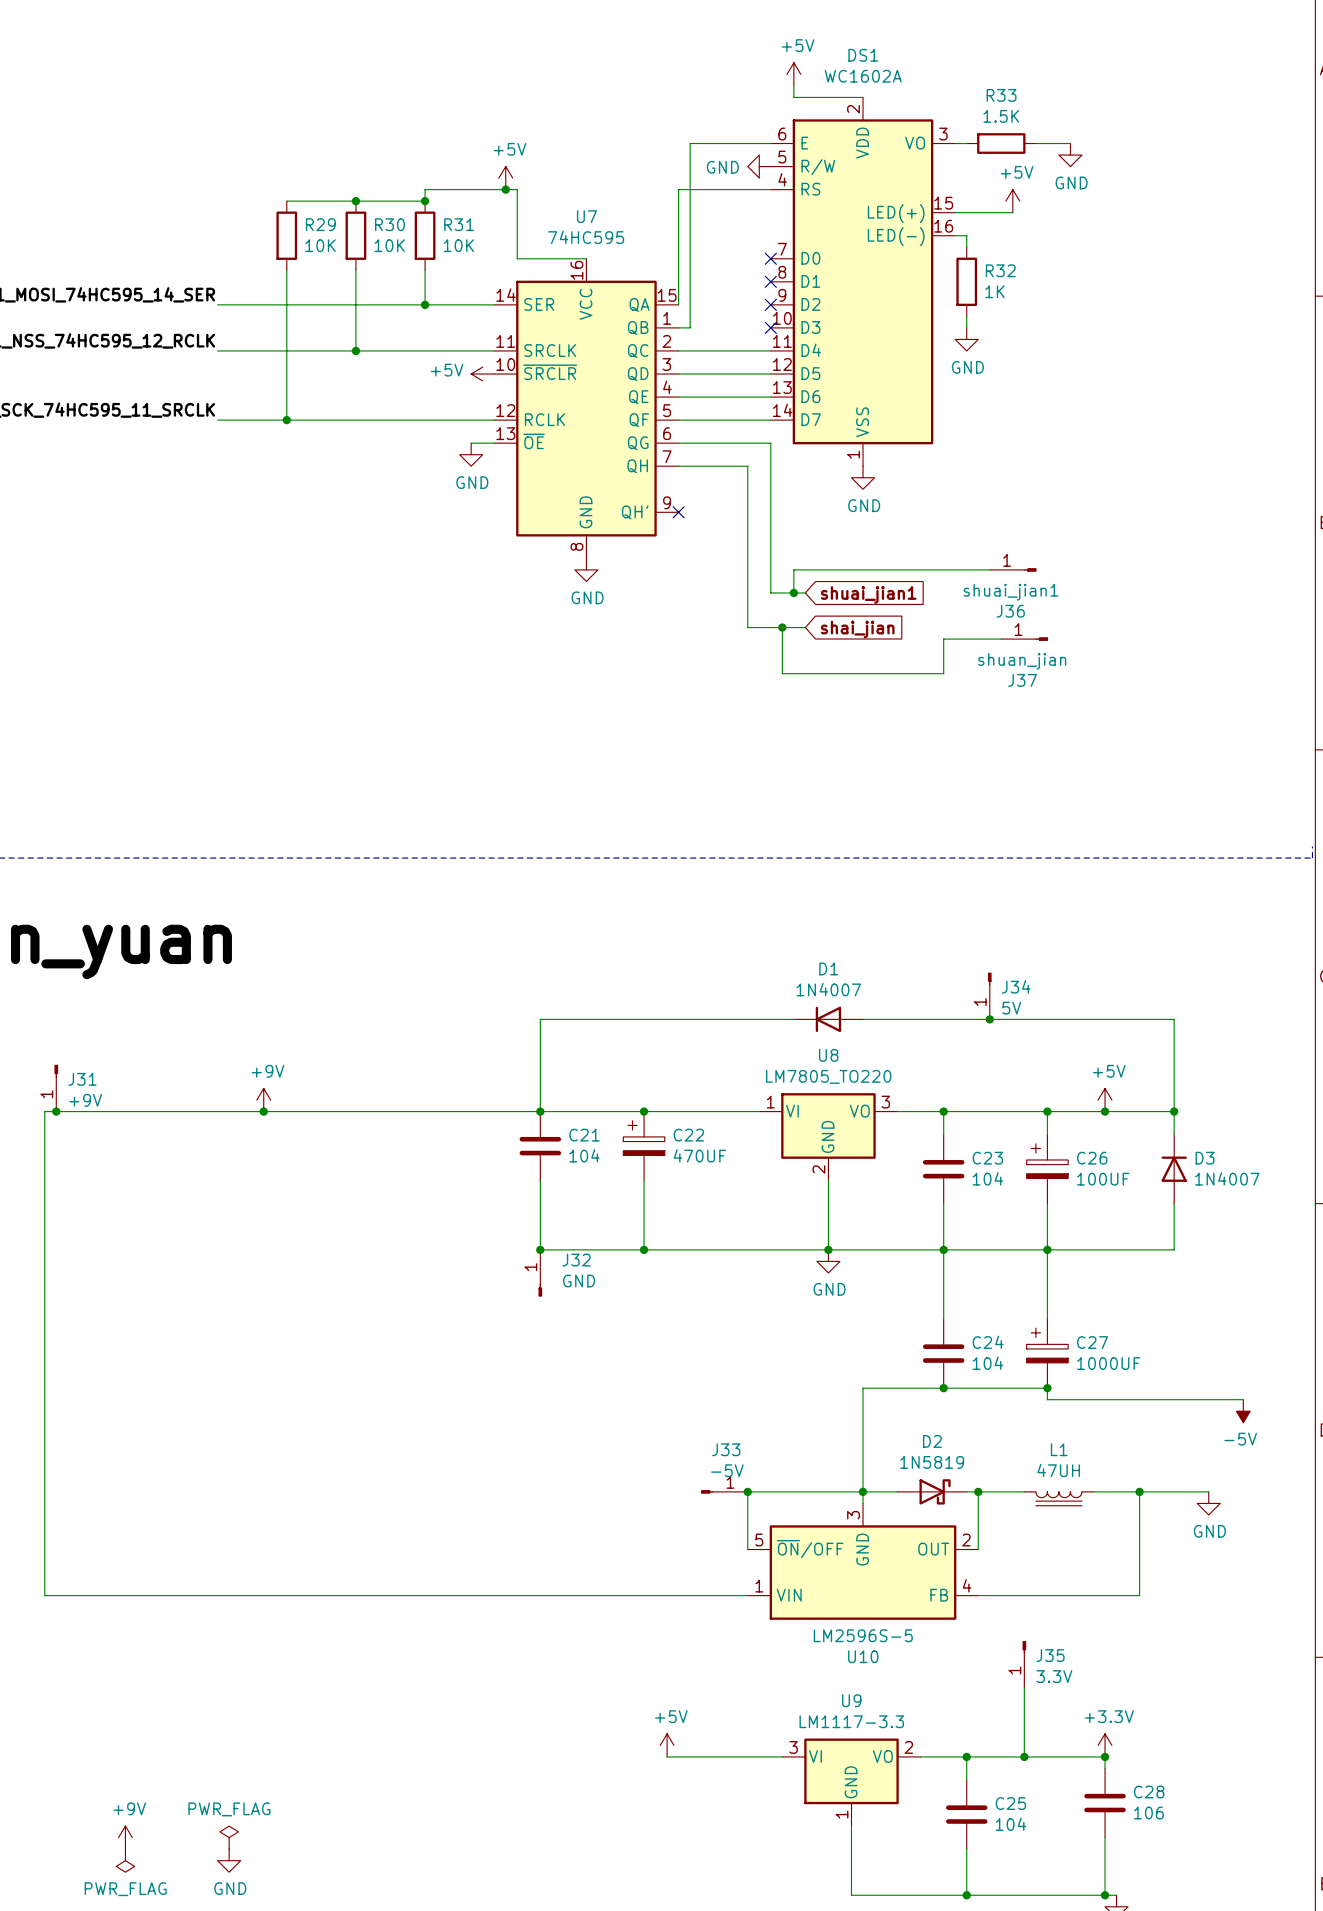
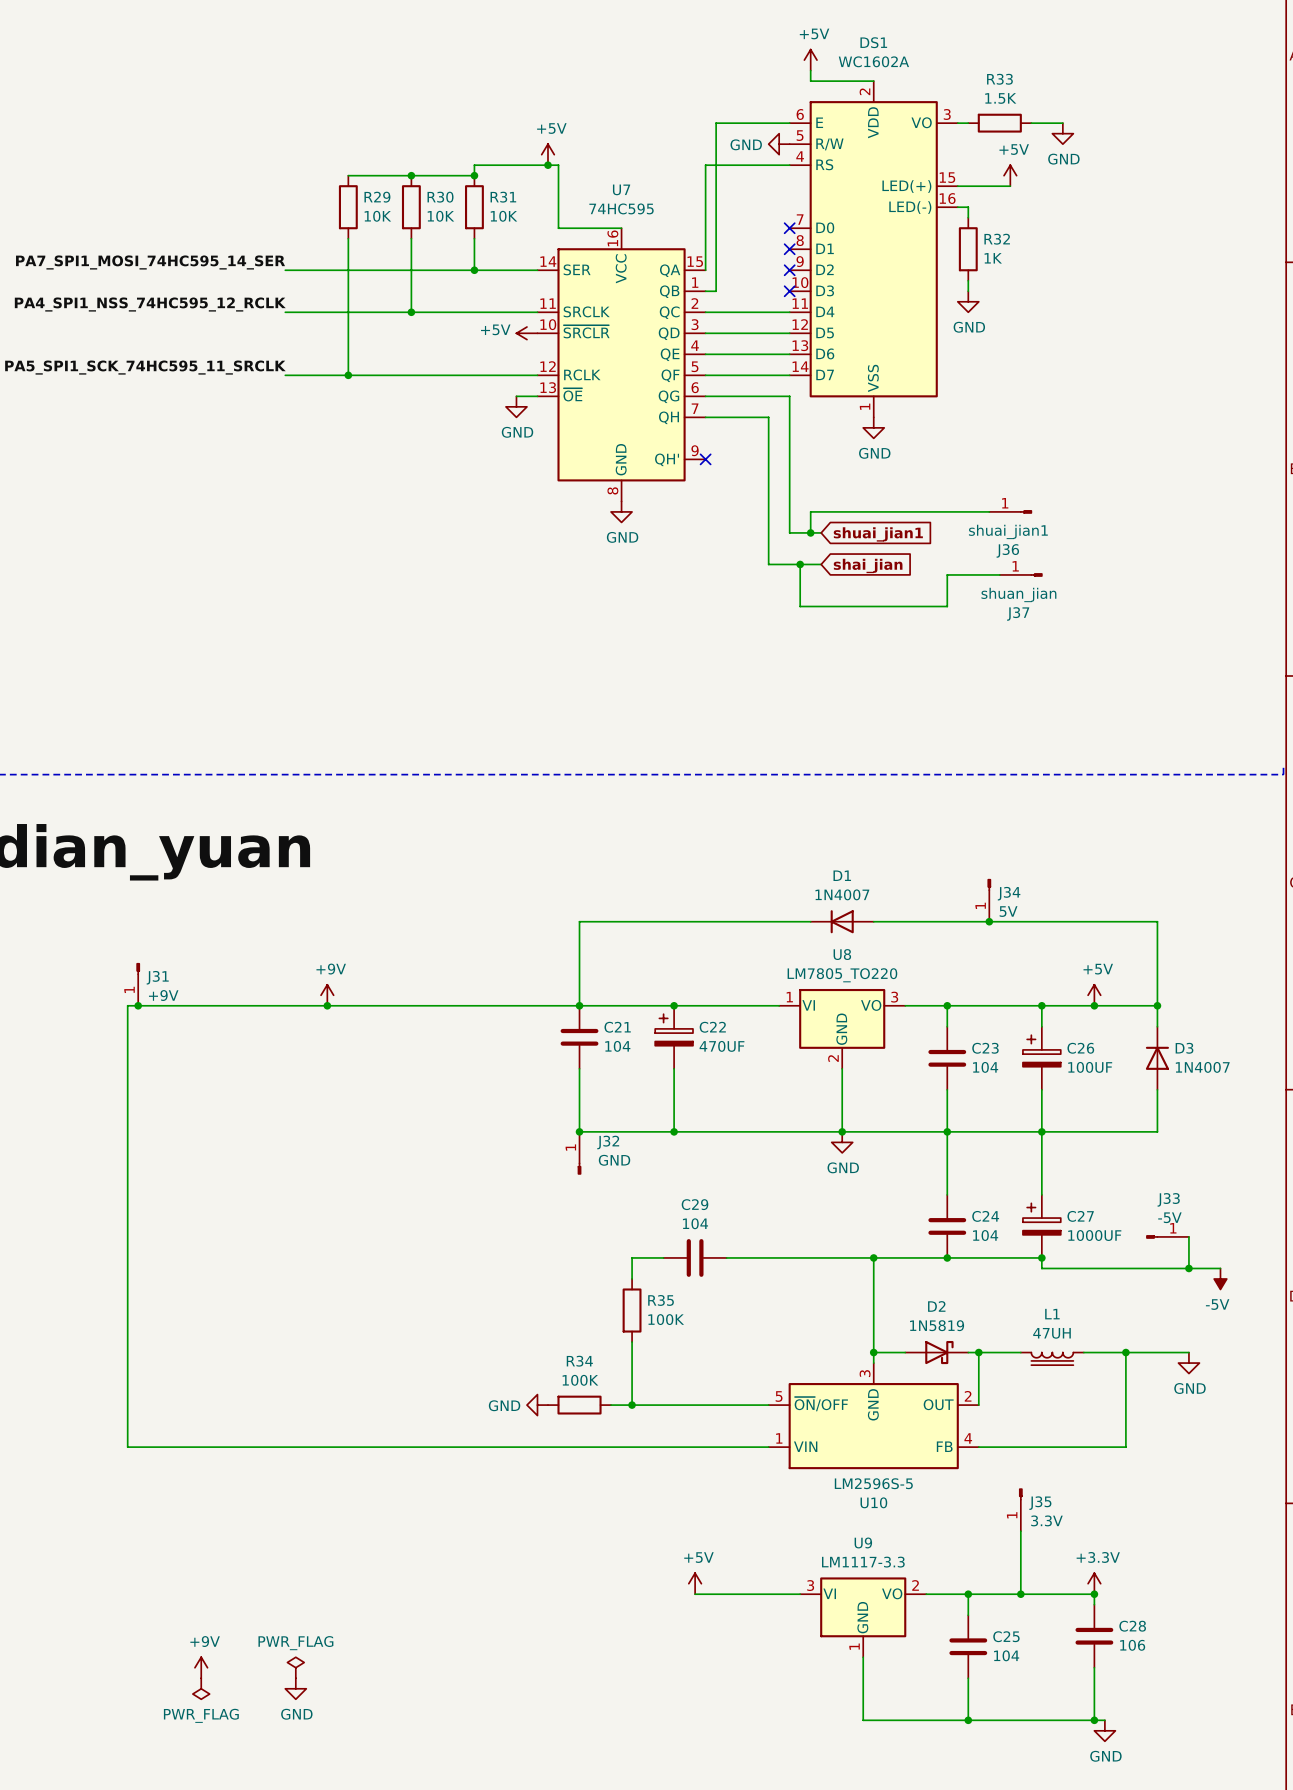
wire: none -> (1188, 1236) (1188, 1268)
wire: none -> (663, 1257) (632, 1257) (632, 1278)
C29: none -> 104 (695, 1257)
wire: none -> (726, 1257) (873, 1257)
junction: none -> (873, 1257)
junction: none -> (1188, 1268)
R35: none -> 100K (632, 1310)
wire: none -> (632, 1342) (632, 1405)
J33 position: (724, 1491) -> (1167, 1236)
junction: (747, 1491) -> none
wire: (863, 1491) (747, 1491) (747, 1549) -> (611, 1405) (768, 1405)
power symbol: none -> GND (537, 1405)
R34: none -> 100K (579, 1405)
junction: none -> (632, 1405)

